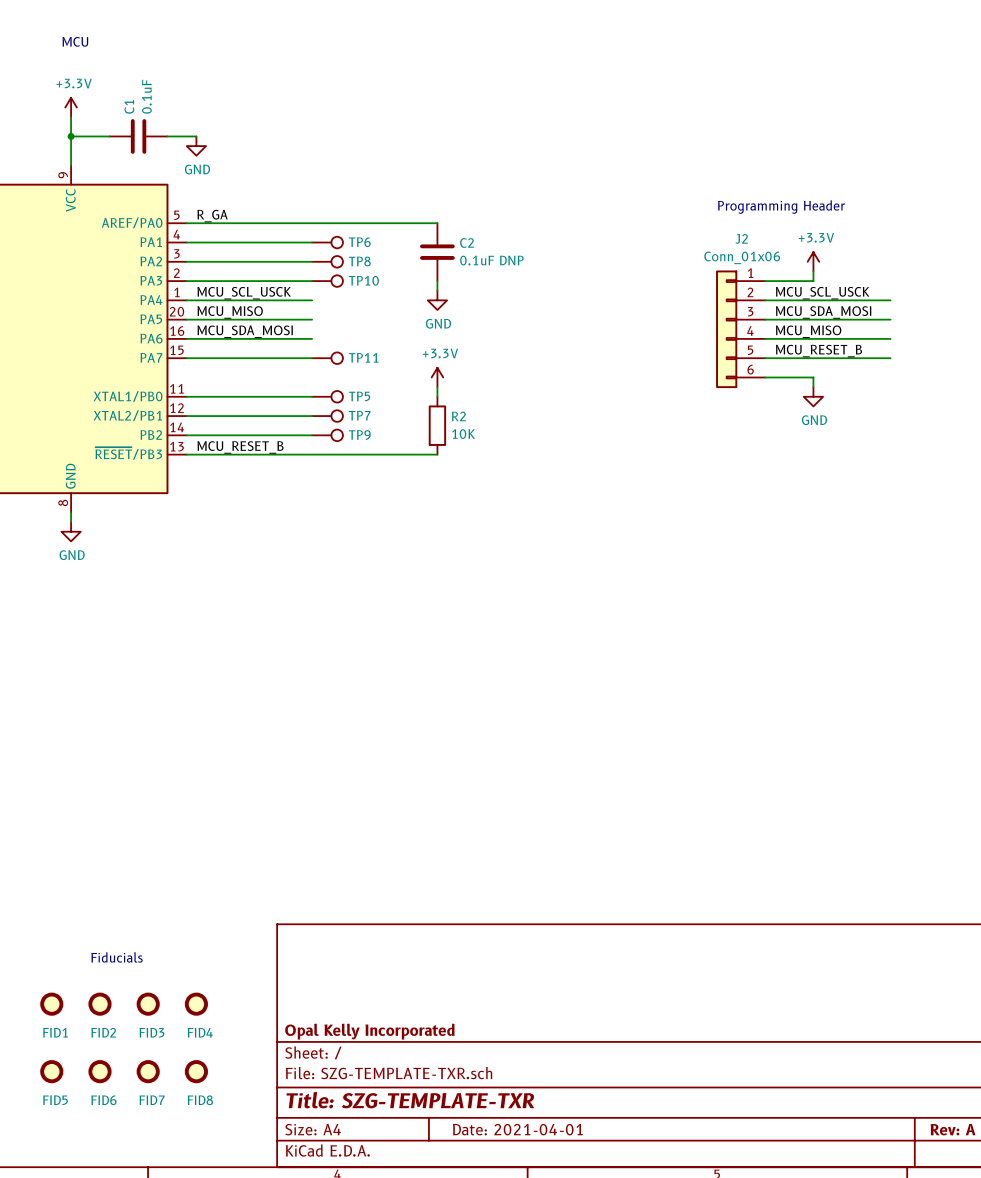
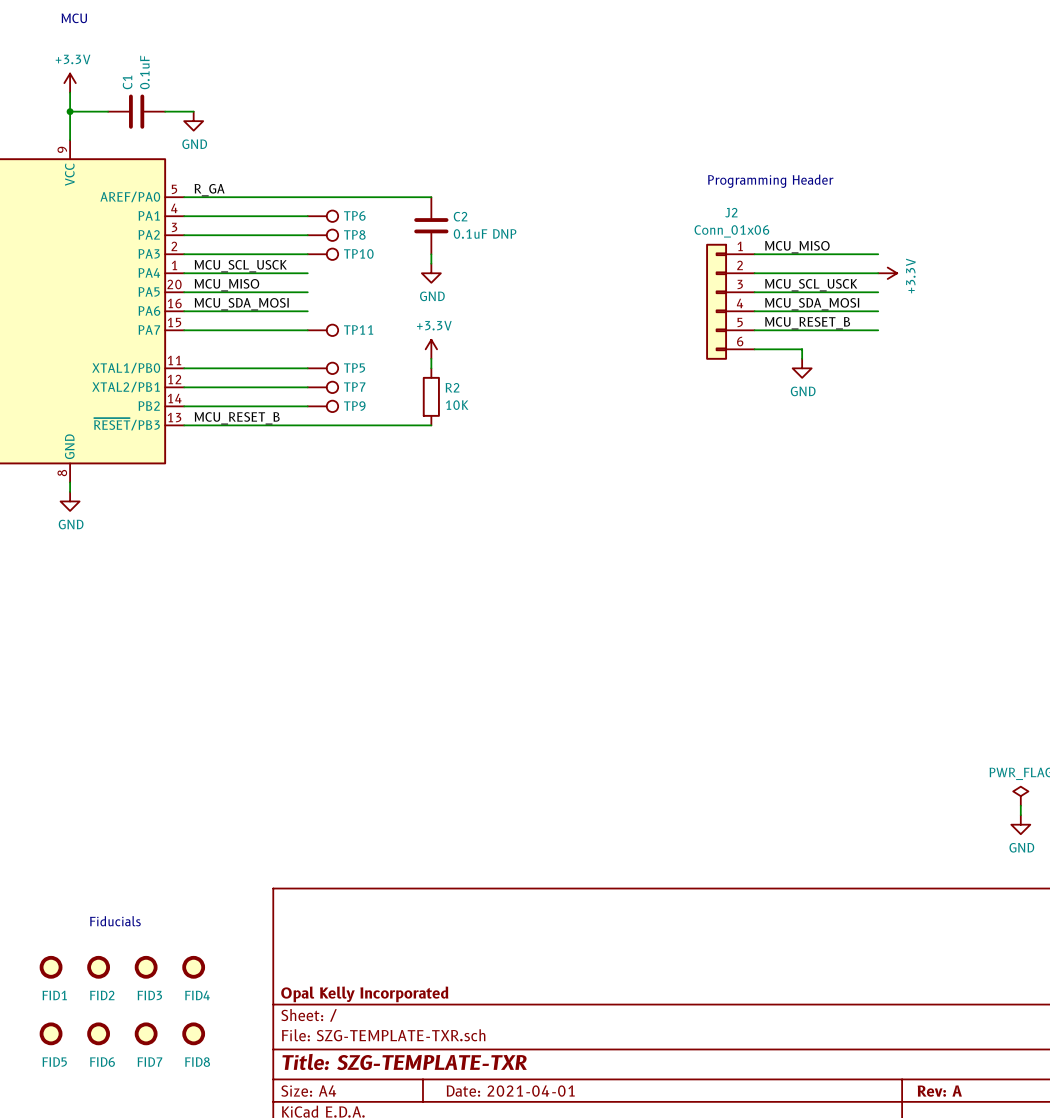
power symbol rotation: 0° (813, 261) -> 90° clockwise (887, 273)
power symbol position: +3.3V (813, 261) -> +3.3V (887, 273)
wire: (813, 271) (813, 281) -> (878, 254) (802, 254)
label: none -> MCU_MISO (797, 247)
label: MCU_SCL_USCK (822, 293) -> none
label: MCU_SDA_MOSI (823, 312) -> MCU_SCL_USCK (811, 285)
label: MCU_MISO (808, 331) -> MCU_SDA_MOSI (812, 304)

